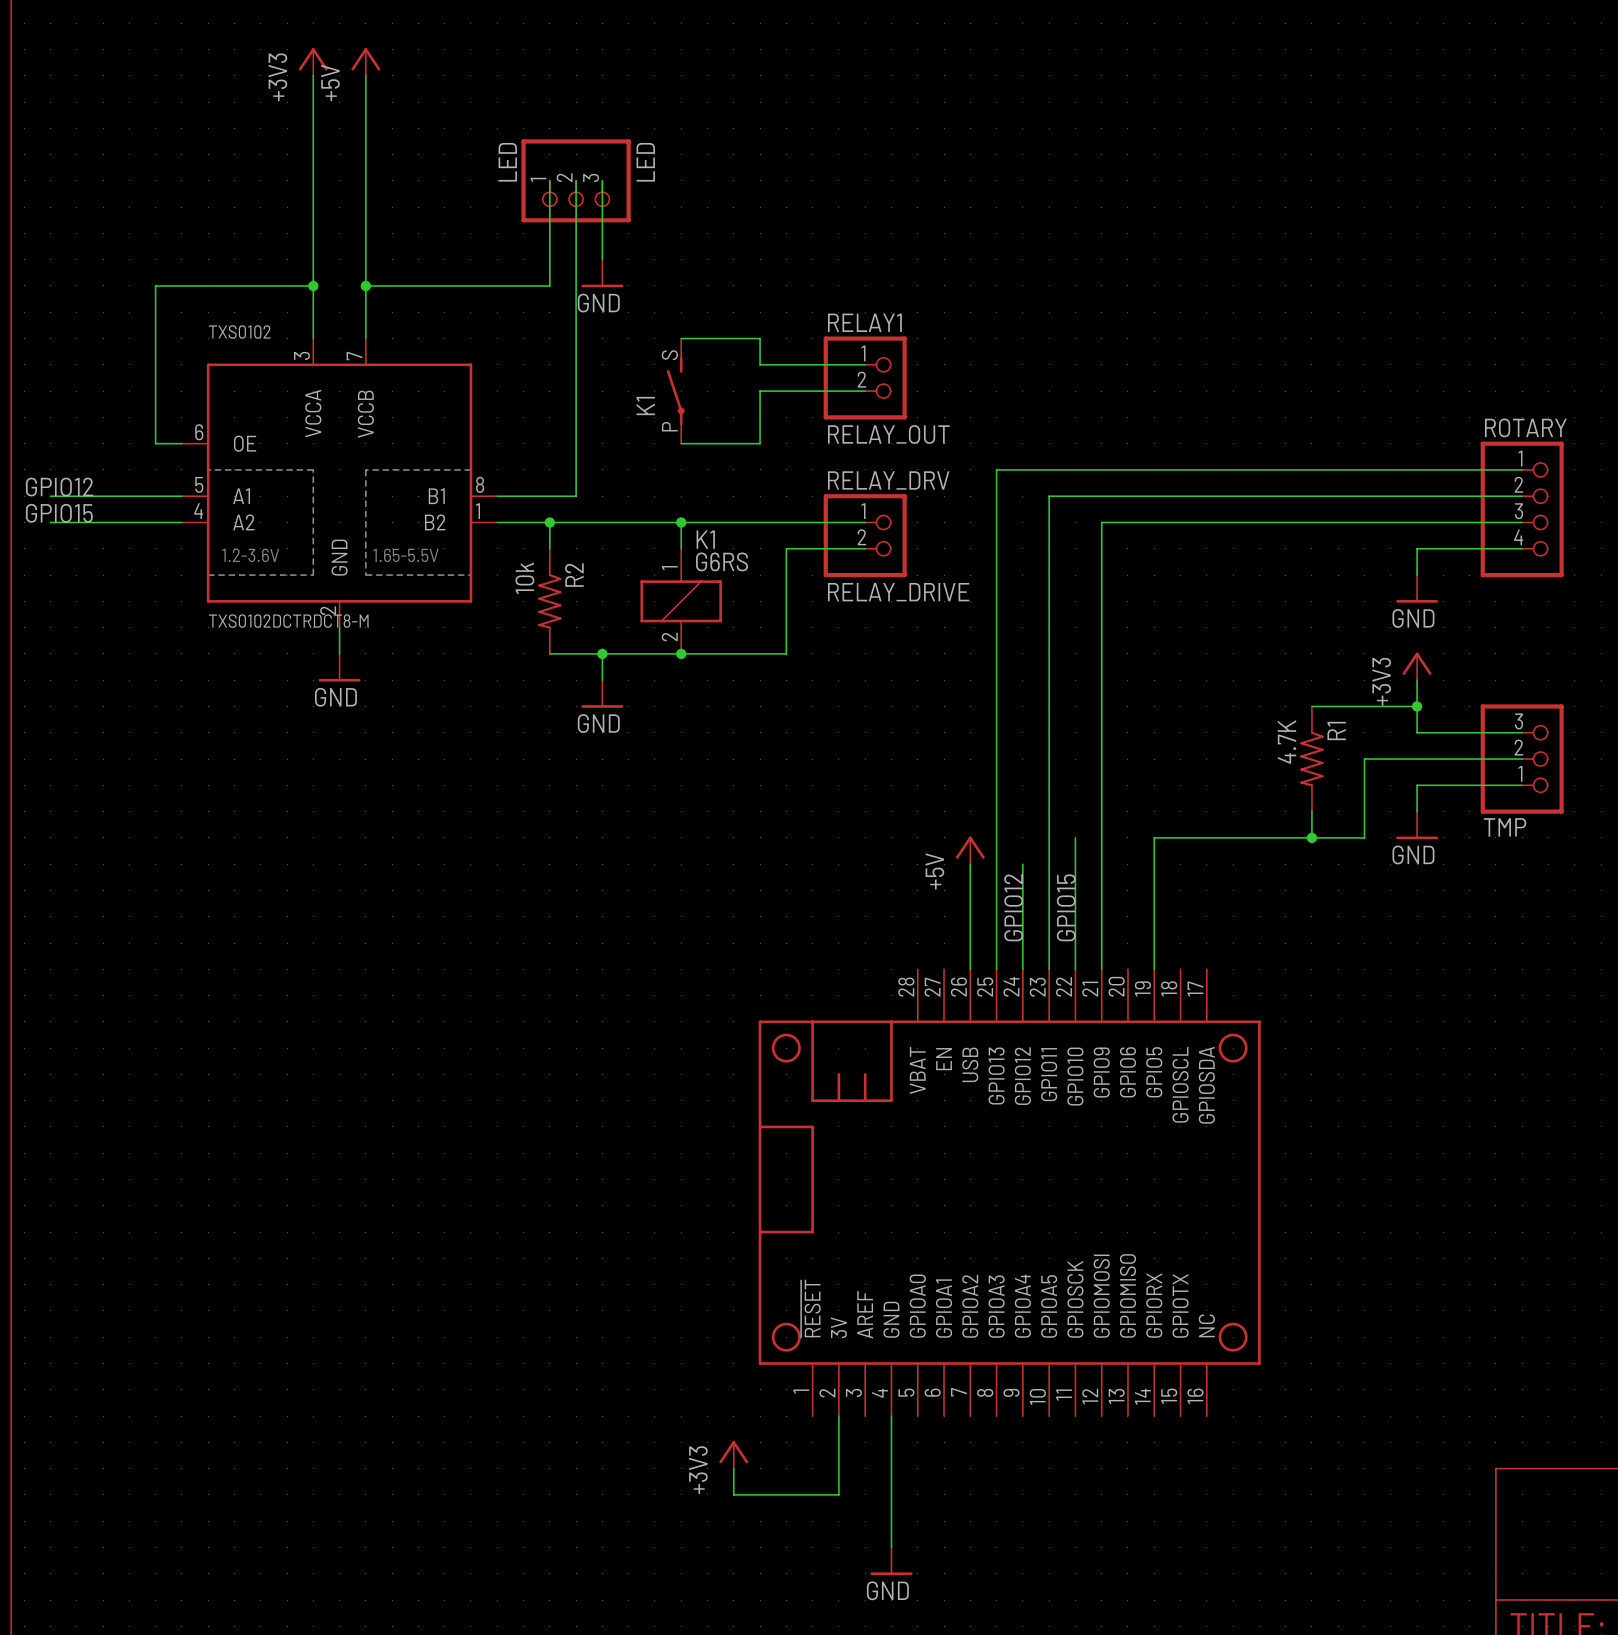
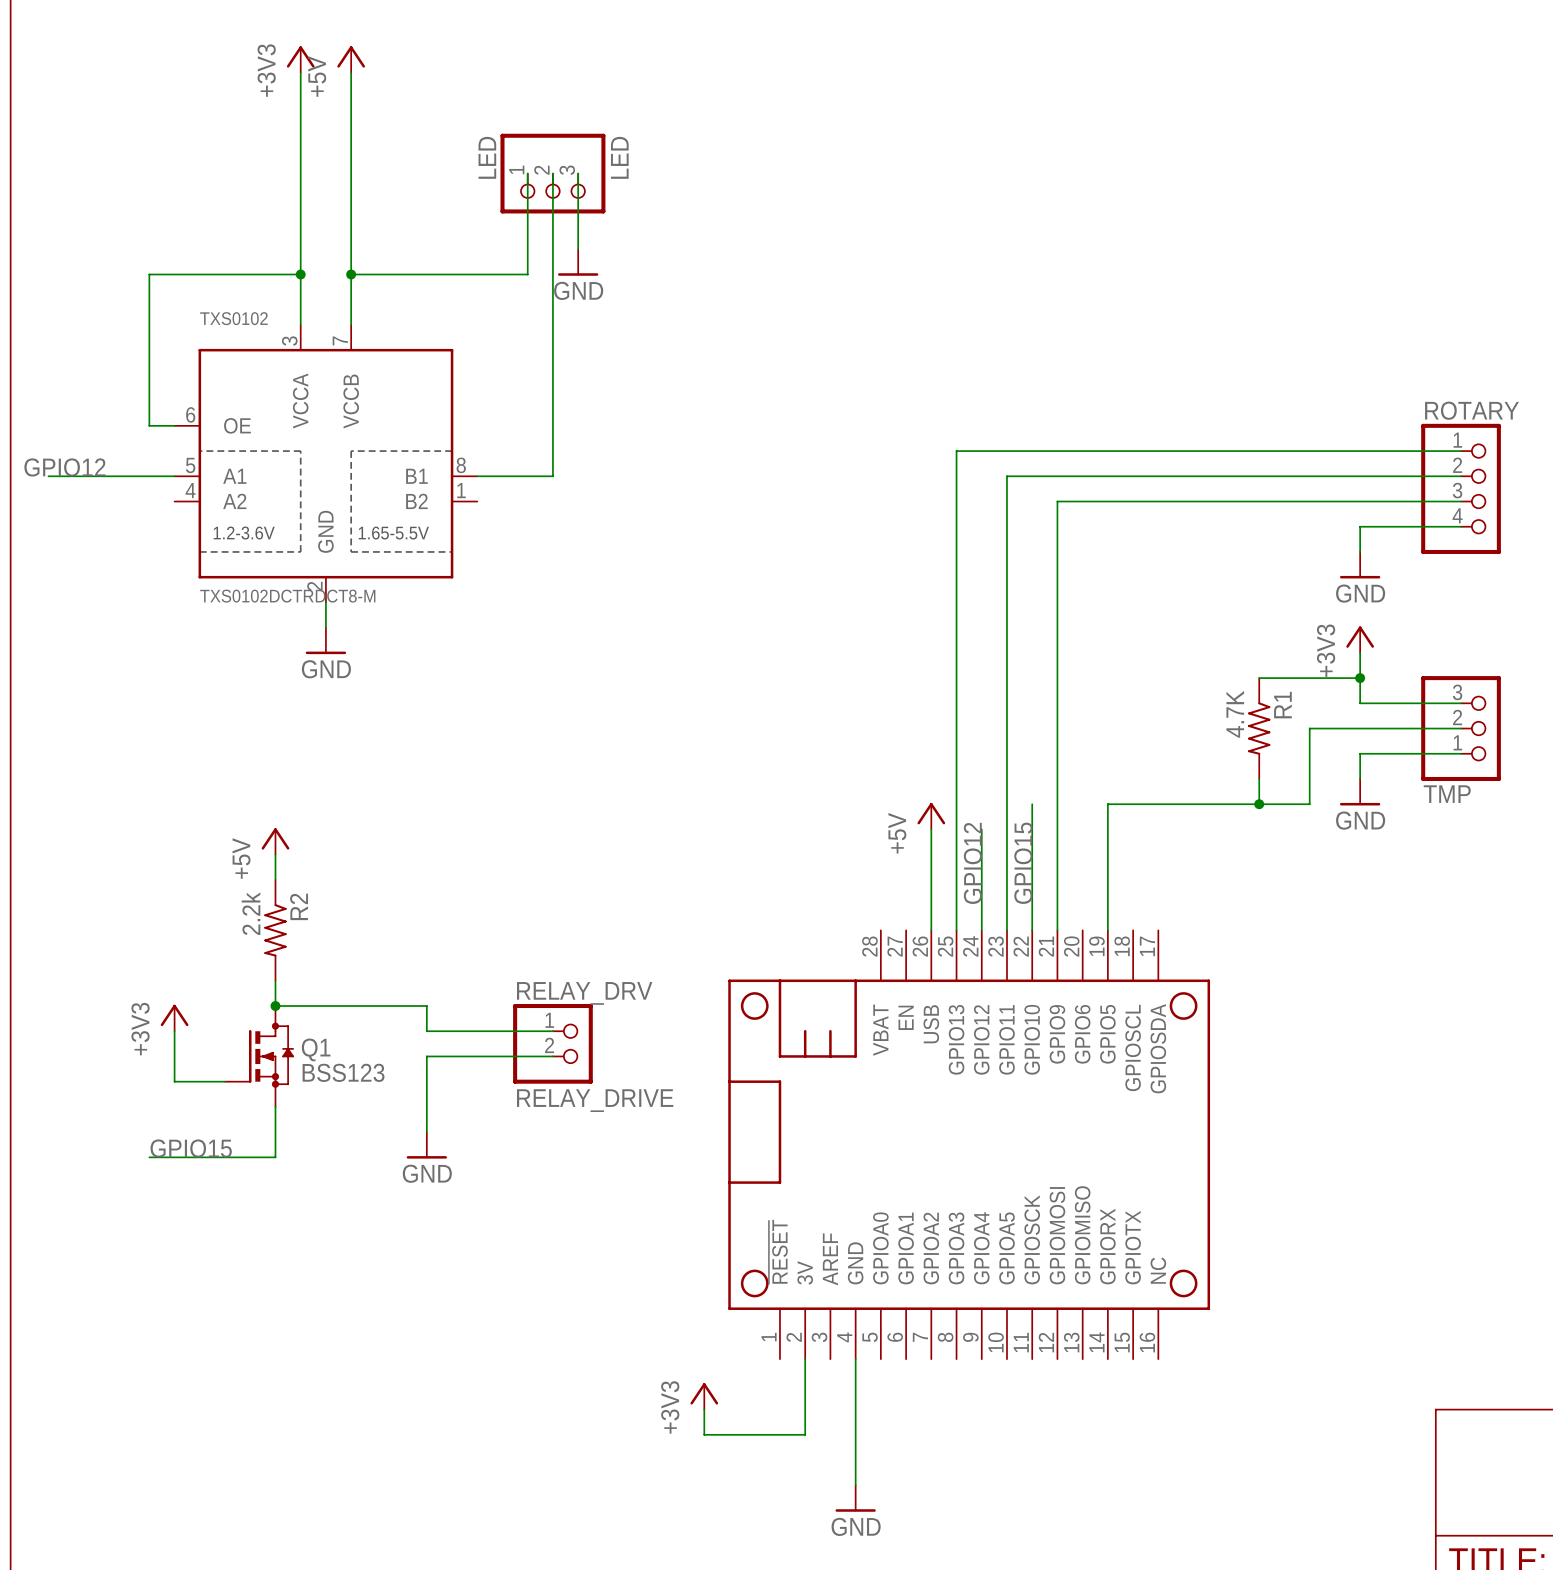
wire: (681, 338) (760, 338) (760, 364) (865, 364) -> none
RELAY1: RELAY_OUT (865, 377) -> none
K1: (675, 391) -> none
wire: (865, 391) (760, 391) (760, 443) (681, 443) -> none
label: GPIO15 (59, 513) -> none
wire: (50, 522) (181, 522) -> none
wire: (497, 522) (865, 522) -> none
wire: (549, 522) (549, 548) -> none
junction: (549, 522) -> none
wire: (681, 522) (681, 548) -> none
junction: (681, 522) -> none
RELAY_DRV: RELAY_DRIVE (865, 535) -> none
wire: (865, 548) (786, 548) (786, 653) (549, 653) -> none
R2 value: 10k (524, 578) -> 2.2k (251, 913)
R2 position: (549, 601) -> (275, 930)
K1: G6RS (681, 601) -> none
wire: (602, 653) (602, 680) -> none
junction: (602, 653) -> none
junction: (681, 653) -> none
power symbol: GND (602, 693) -> none
power symbol: none -> +5V (275, 841)
wire: none -> (275, 854) (275, 879)
wire: none -> (275, 980) (275, 1006) (426, 1006) (426, 1031) (552, 1031)
junction: none -> (275, 1006)
power symbol: none -> +3V3 (174, 1017)
wire: none -> (174, 1031) (174, 1081) (225, 1081)
RELAY_DRV: none -> RELAY_DRIVE (552, 1043)
Q1: none -> BSS123 (259, 1056)
wire: none -> (552, 1056) (426, 1056) (426, 1132)
wire: none -> (275, 1106) (275, 1157) (149, 1157)
power symbol: none -> GND (426, 1145)
label: none -> GPIO15 (191, 1148)

